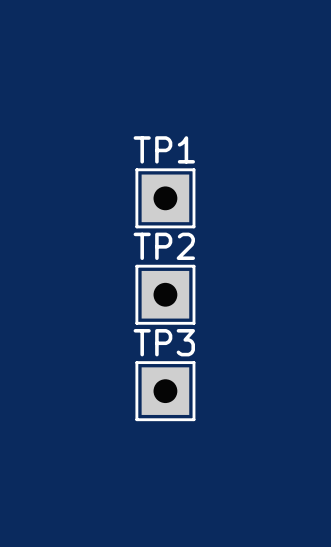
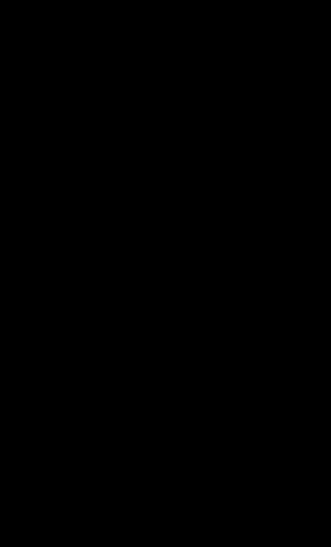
TP1: (165, 198) -> none
TP2: (165, 294) -> none
TP3: (165, 391) -> none

